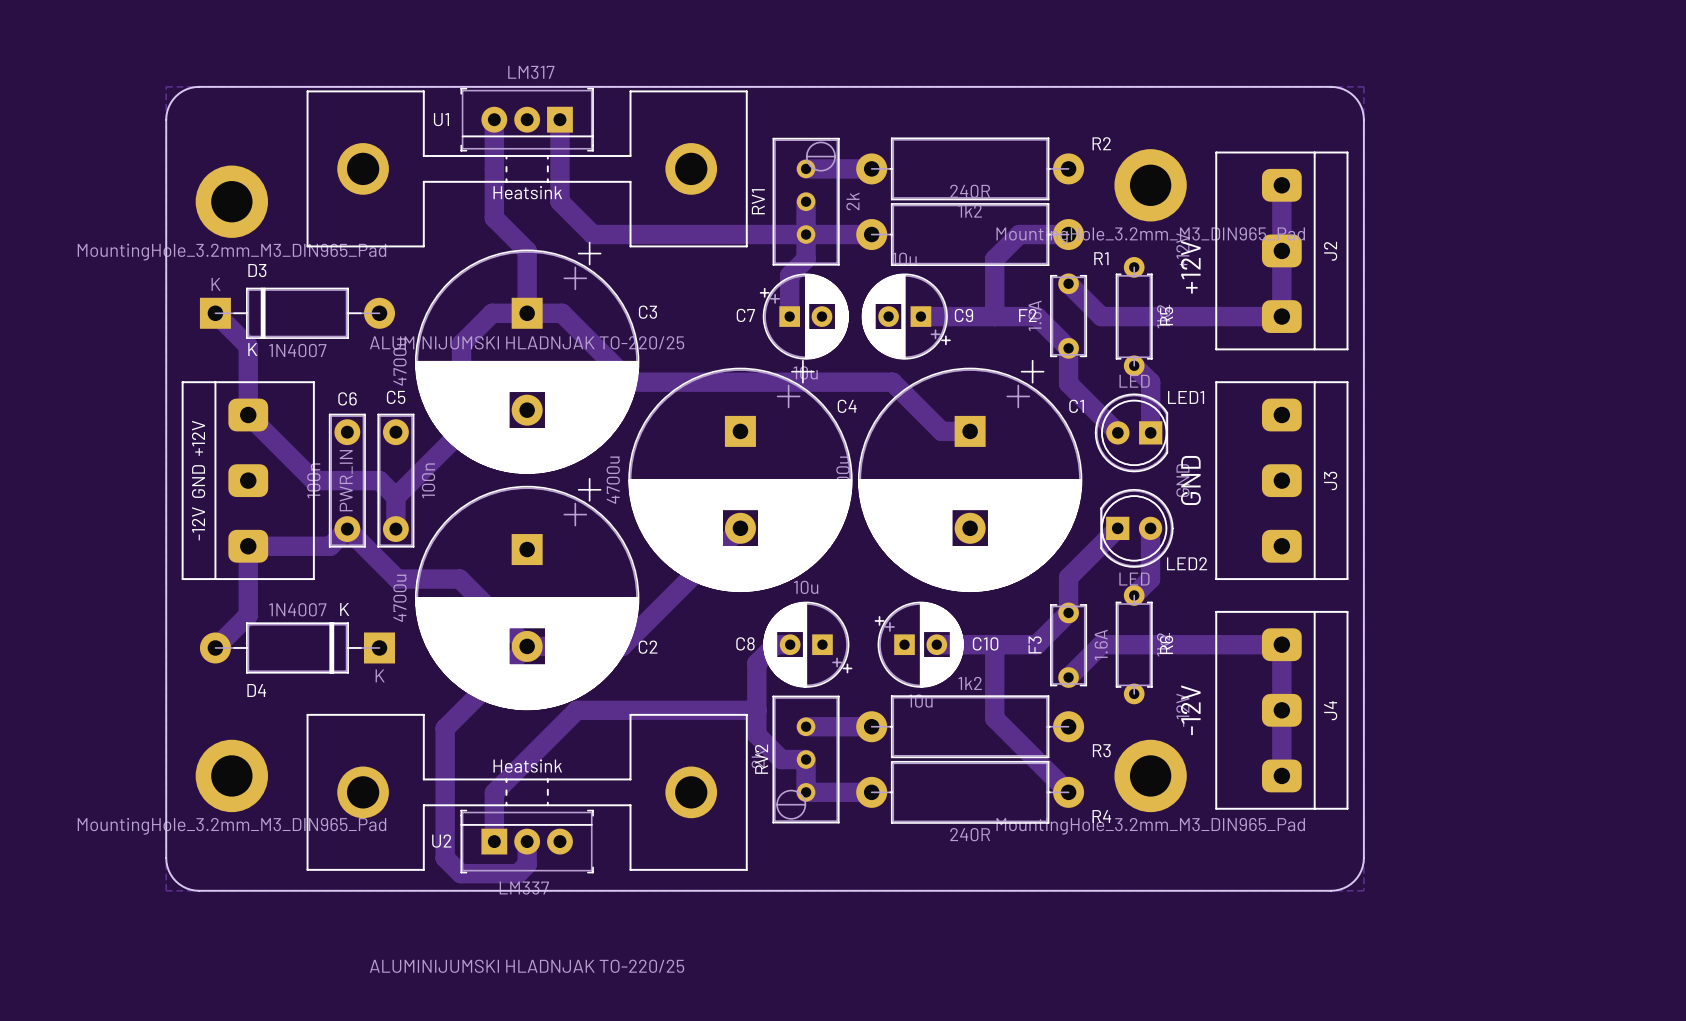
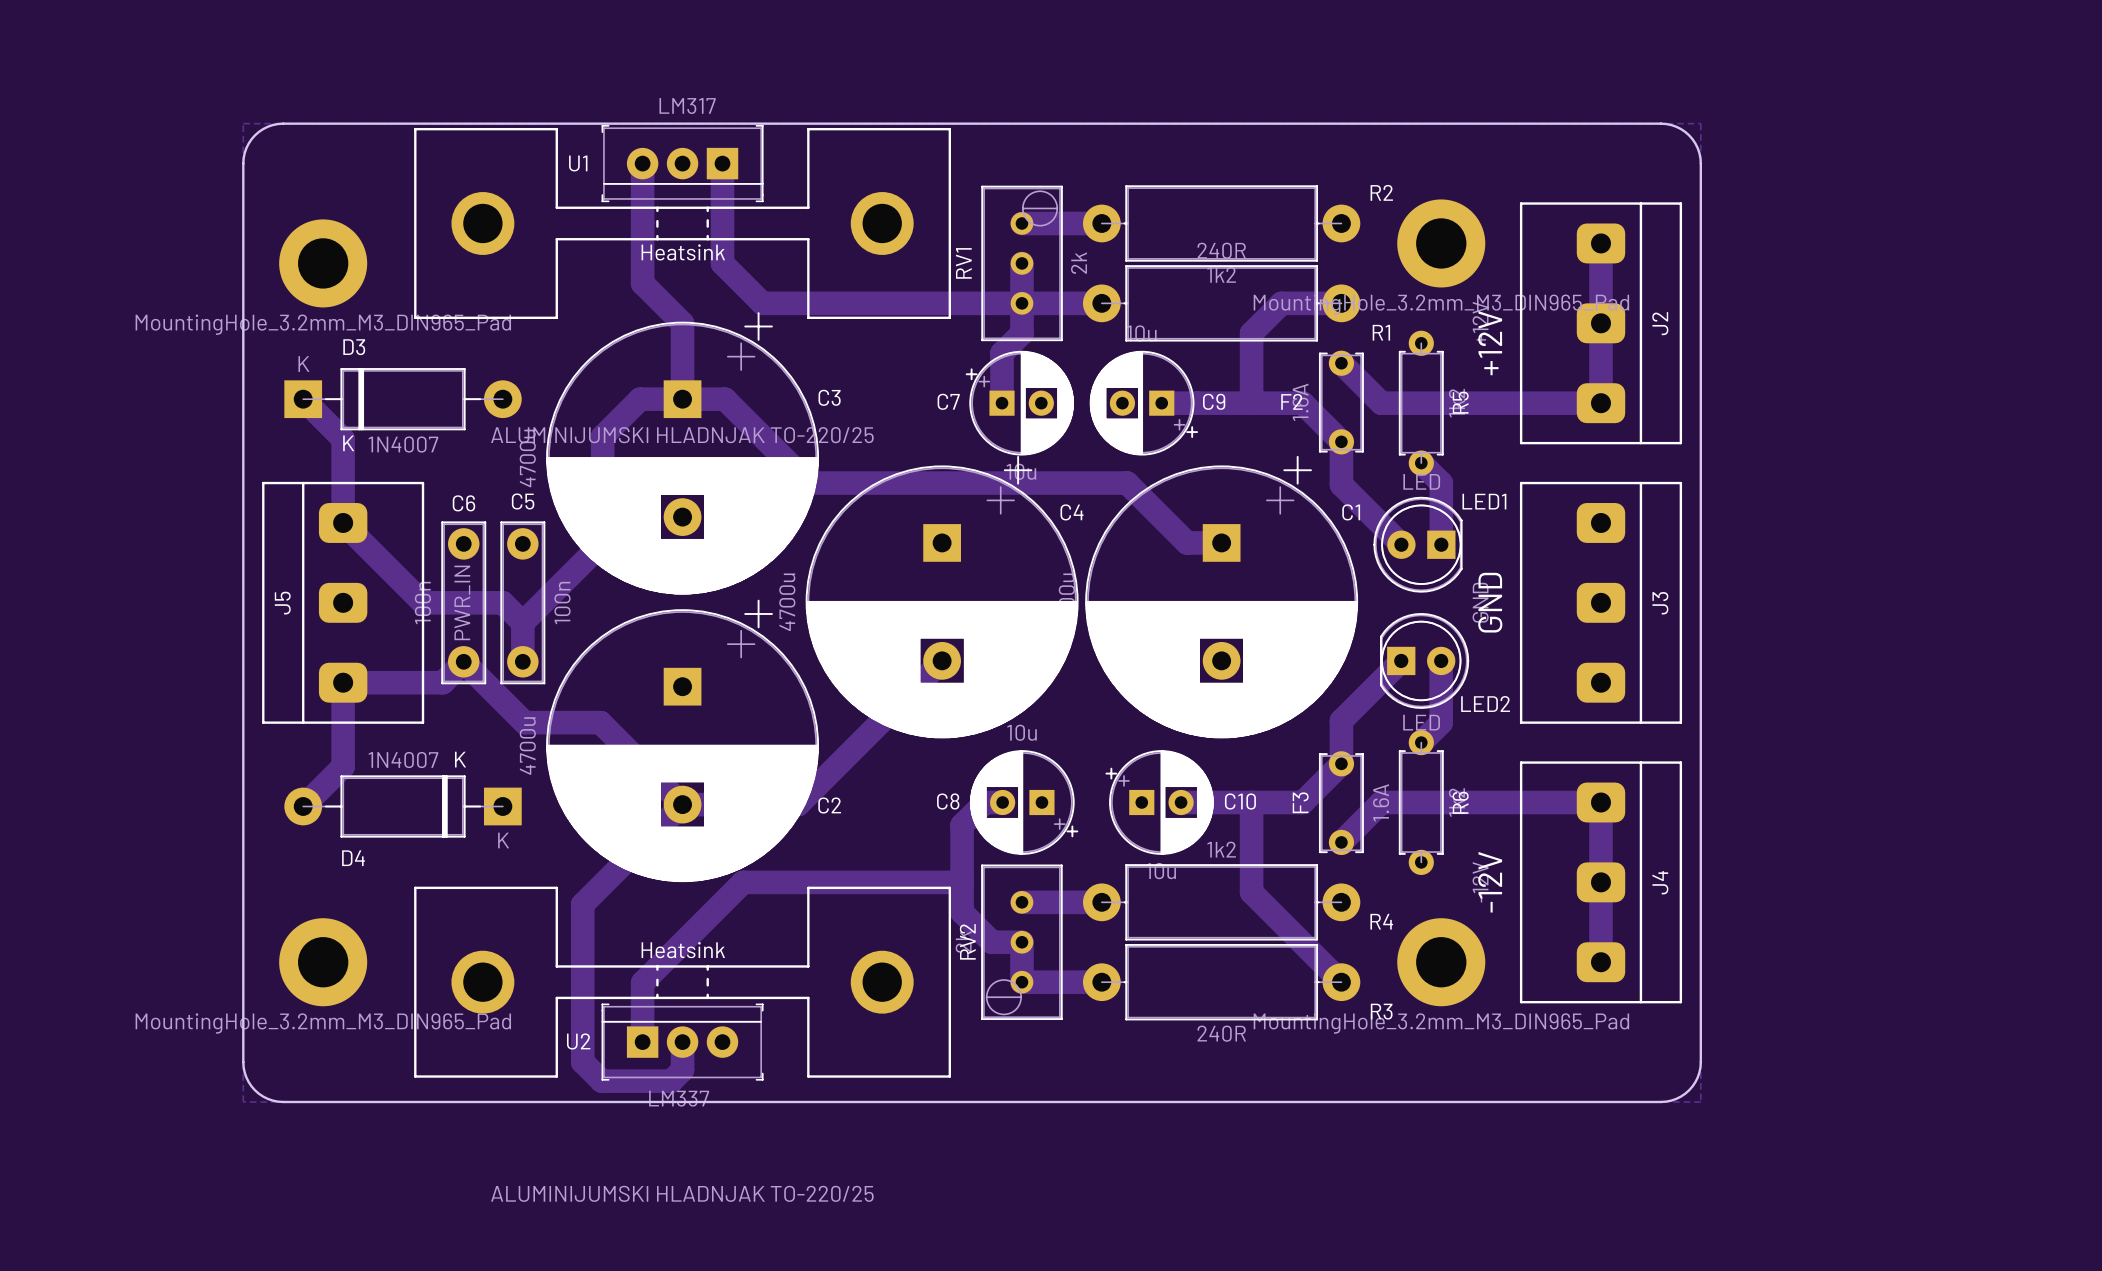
-12V GND +12V name: -12V GND +12V (198, 480) -> J5 (282, 603)
R3 name position: R3 (1101, 750) -> R3 (1381, 1011)
R4 name position: R4 (1101, 816) -> R4 (1381, 921)

